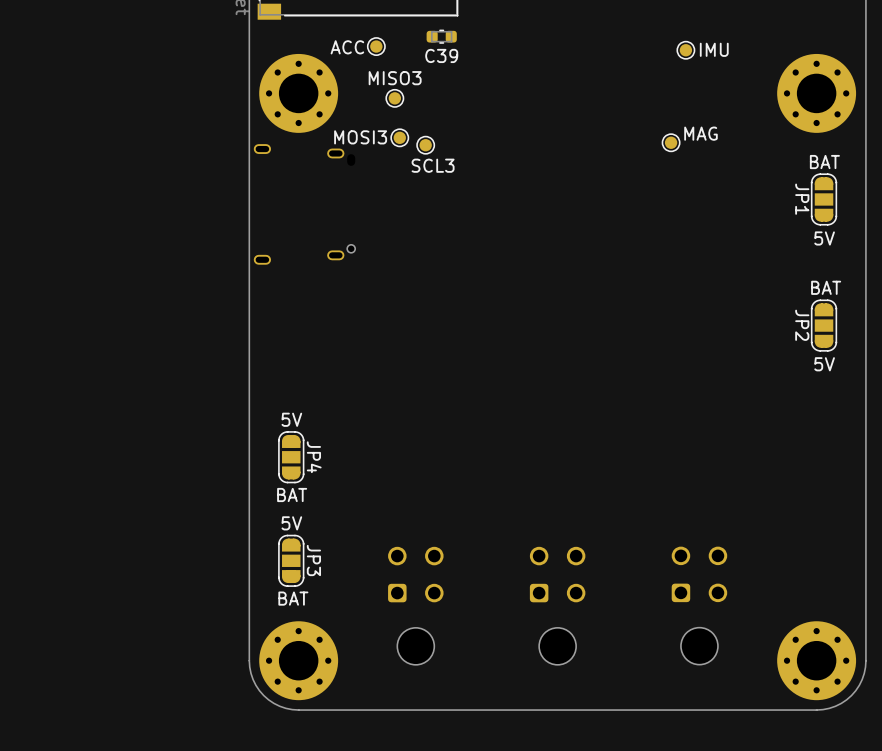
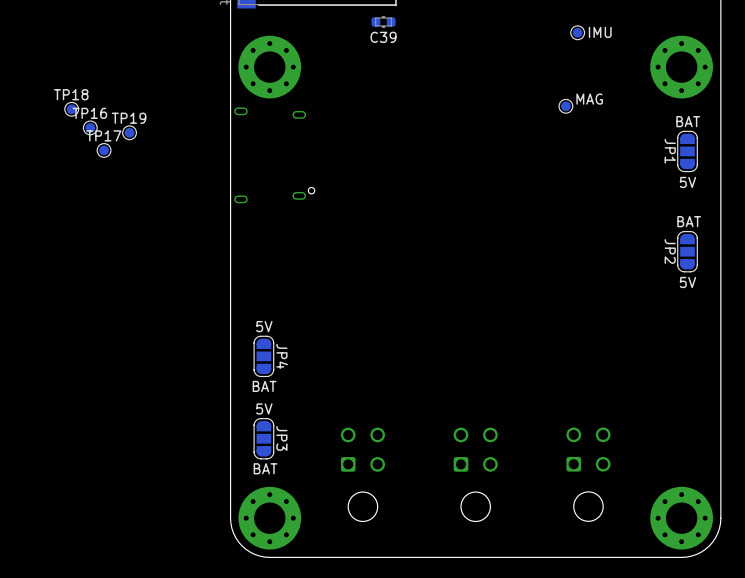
part: (376, 46) -> none
part: (394, 98) -> none
part: (399, 137) -> none
part: (425, 145) -> none
TP18: none -> (71, 109)
TP16: none -> (90, 127)
TP19: none -> (129, 132)
TP17: none -> (104, 150)

